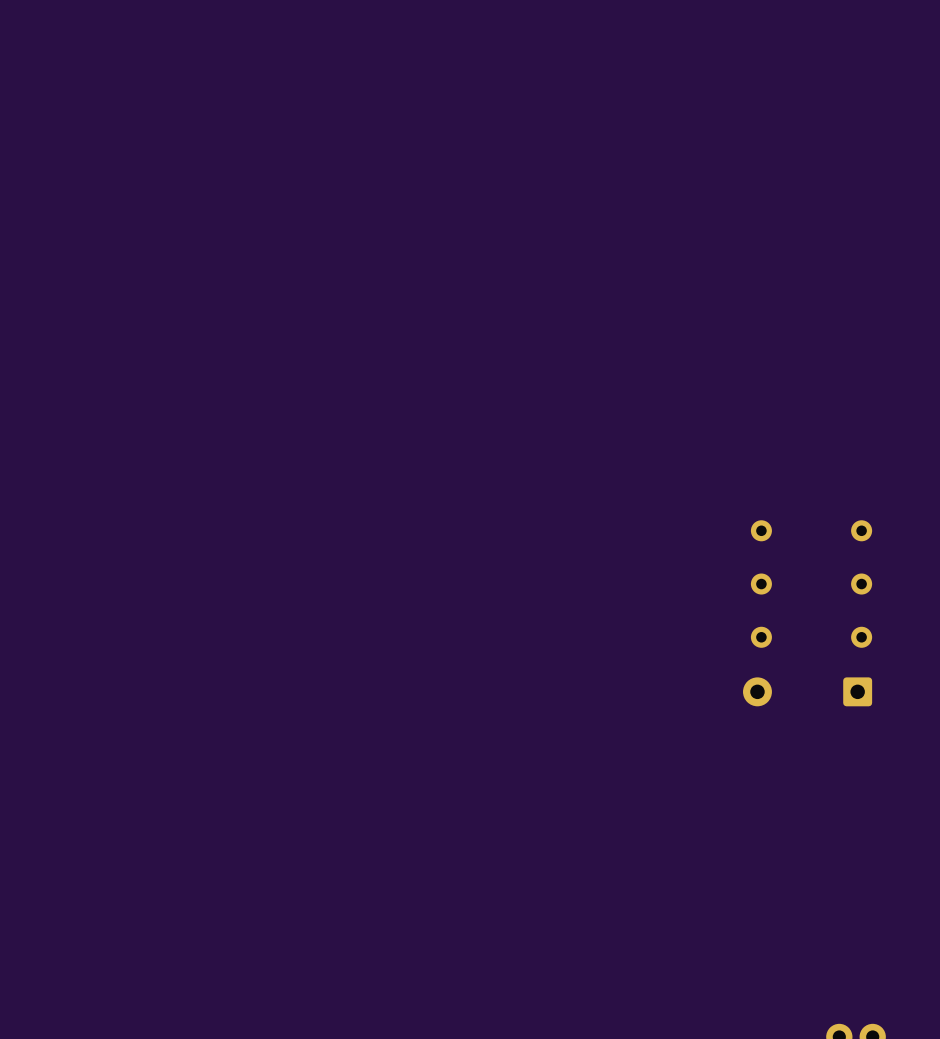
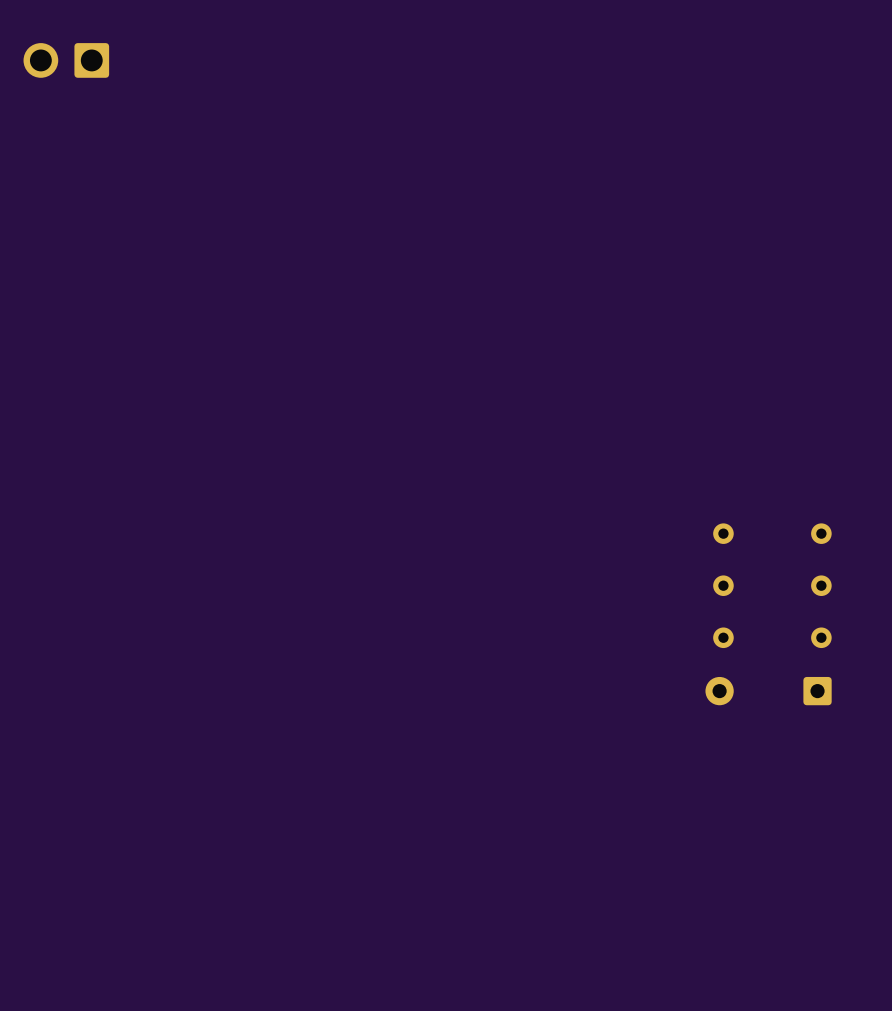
part: none -> (66, 60)

